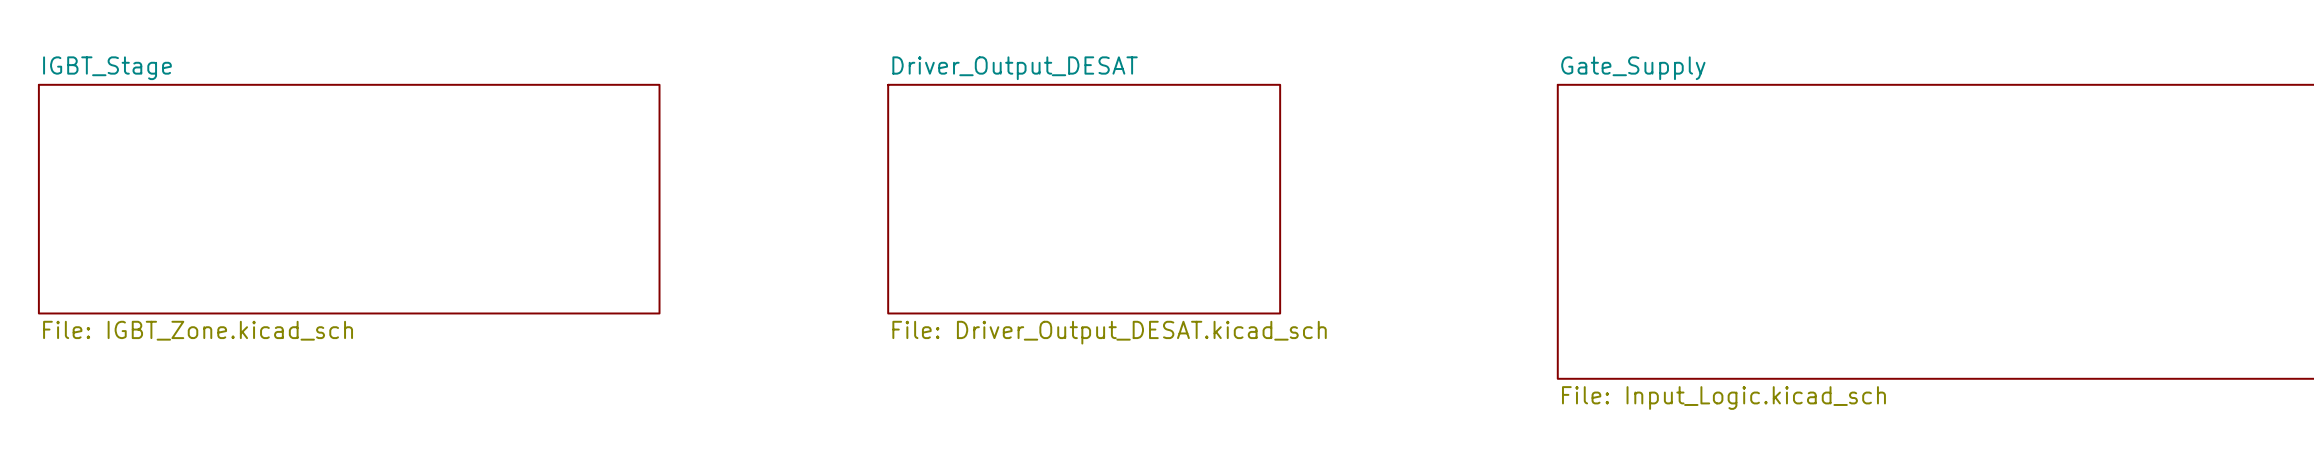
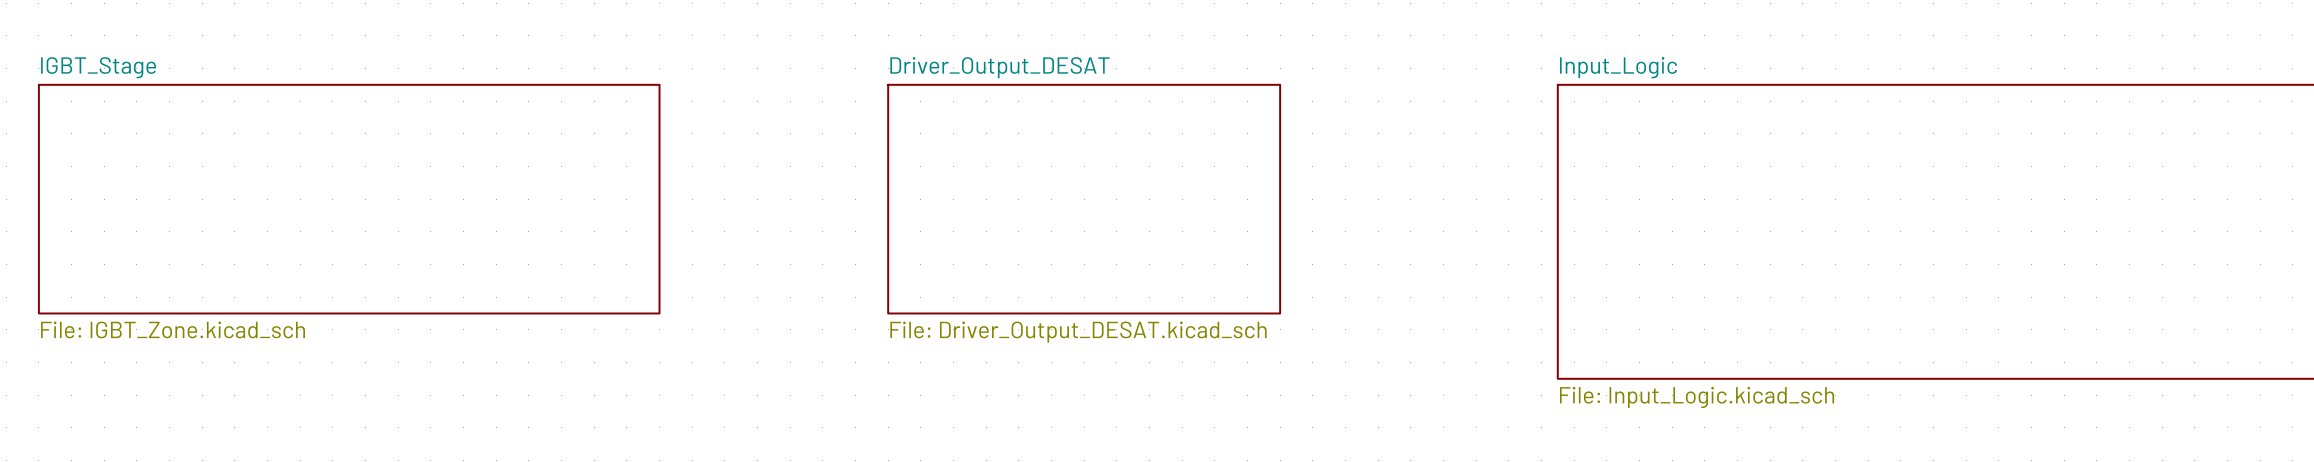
sheet Gate_Supply name: Gate_Supply (1633, 68) -> Input_Logic (1618, 67)

